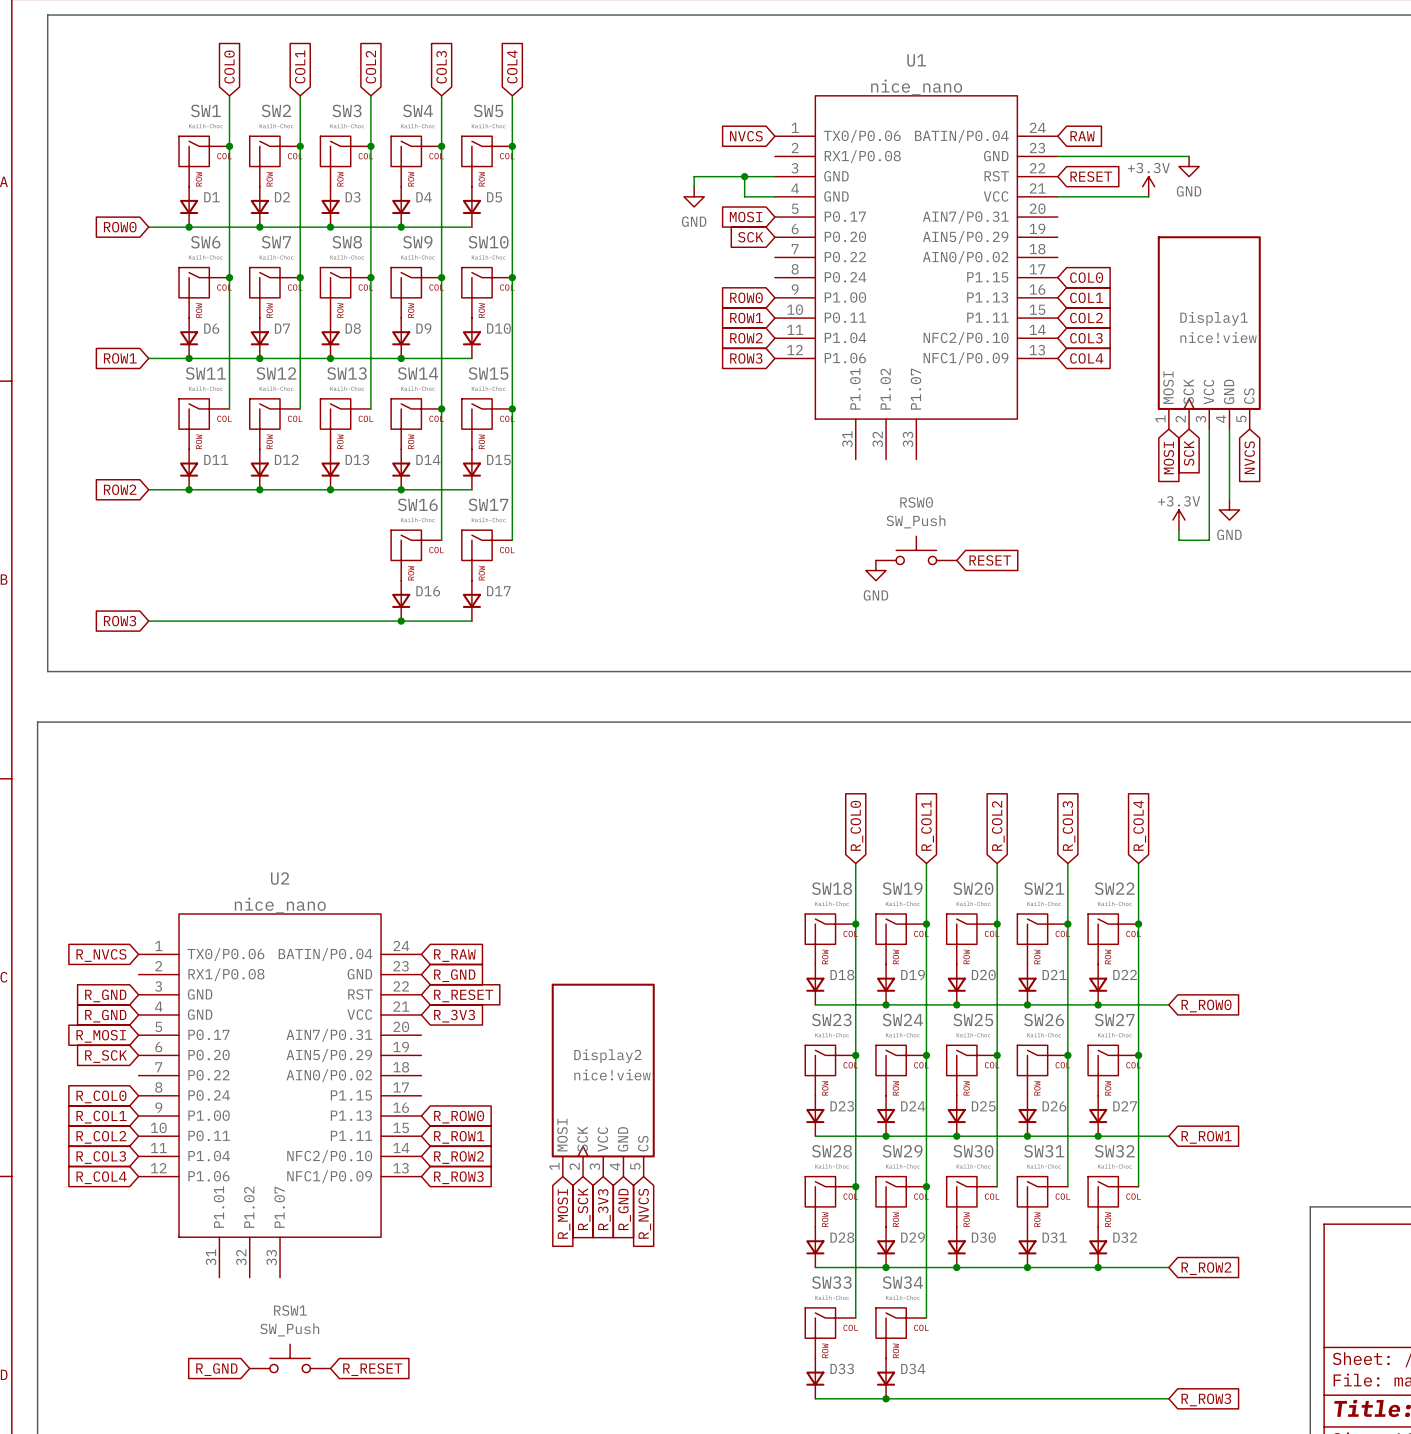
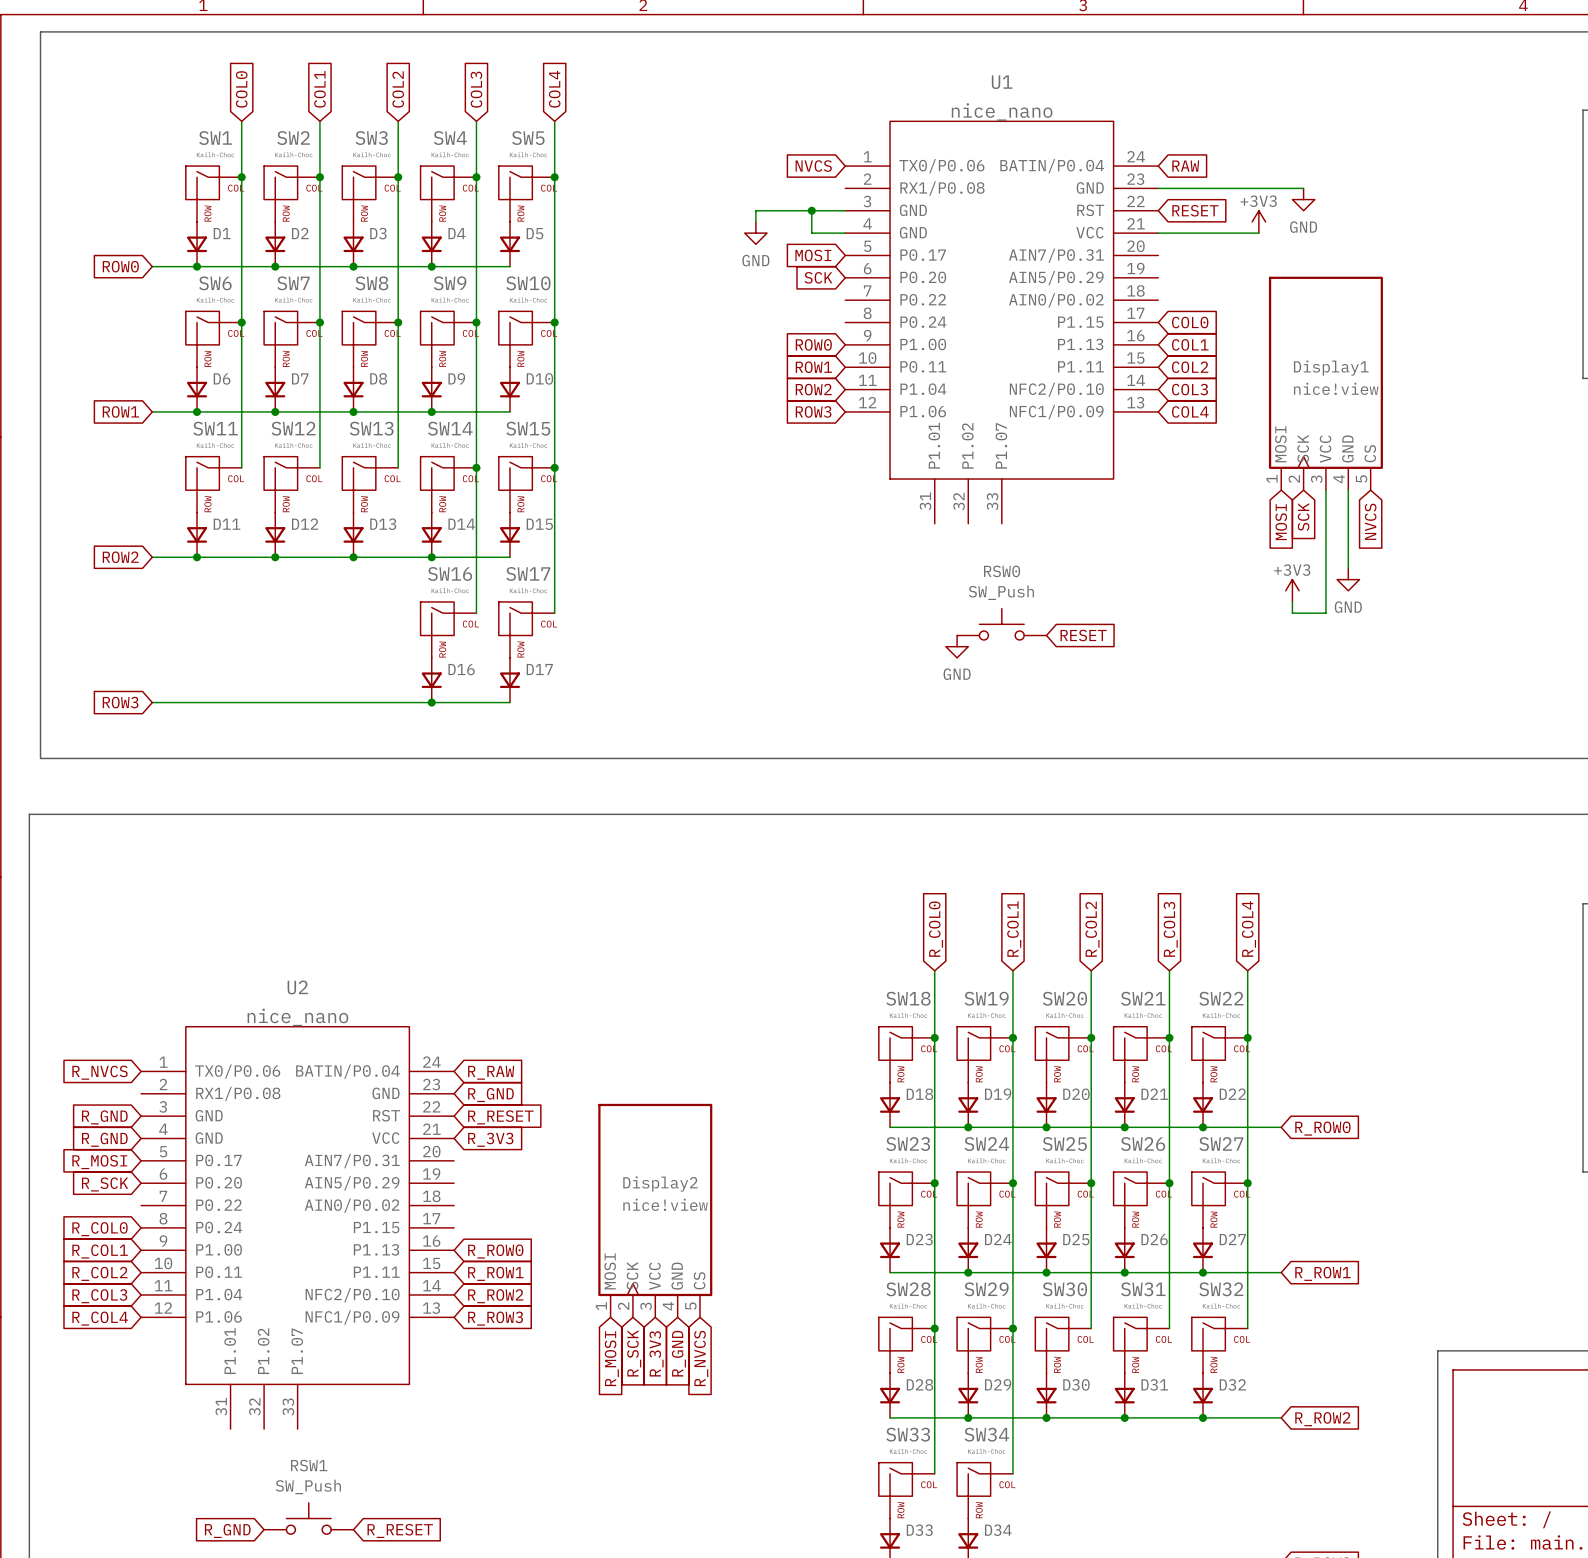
power symbol: +3.3V (1148, 186) -> +3V3 (1258, 221)
power symbol: +3.3V (1178, 520) -> +3V3 (1292, 590)

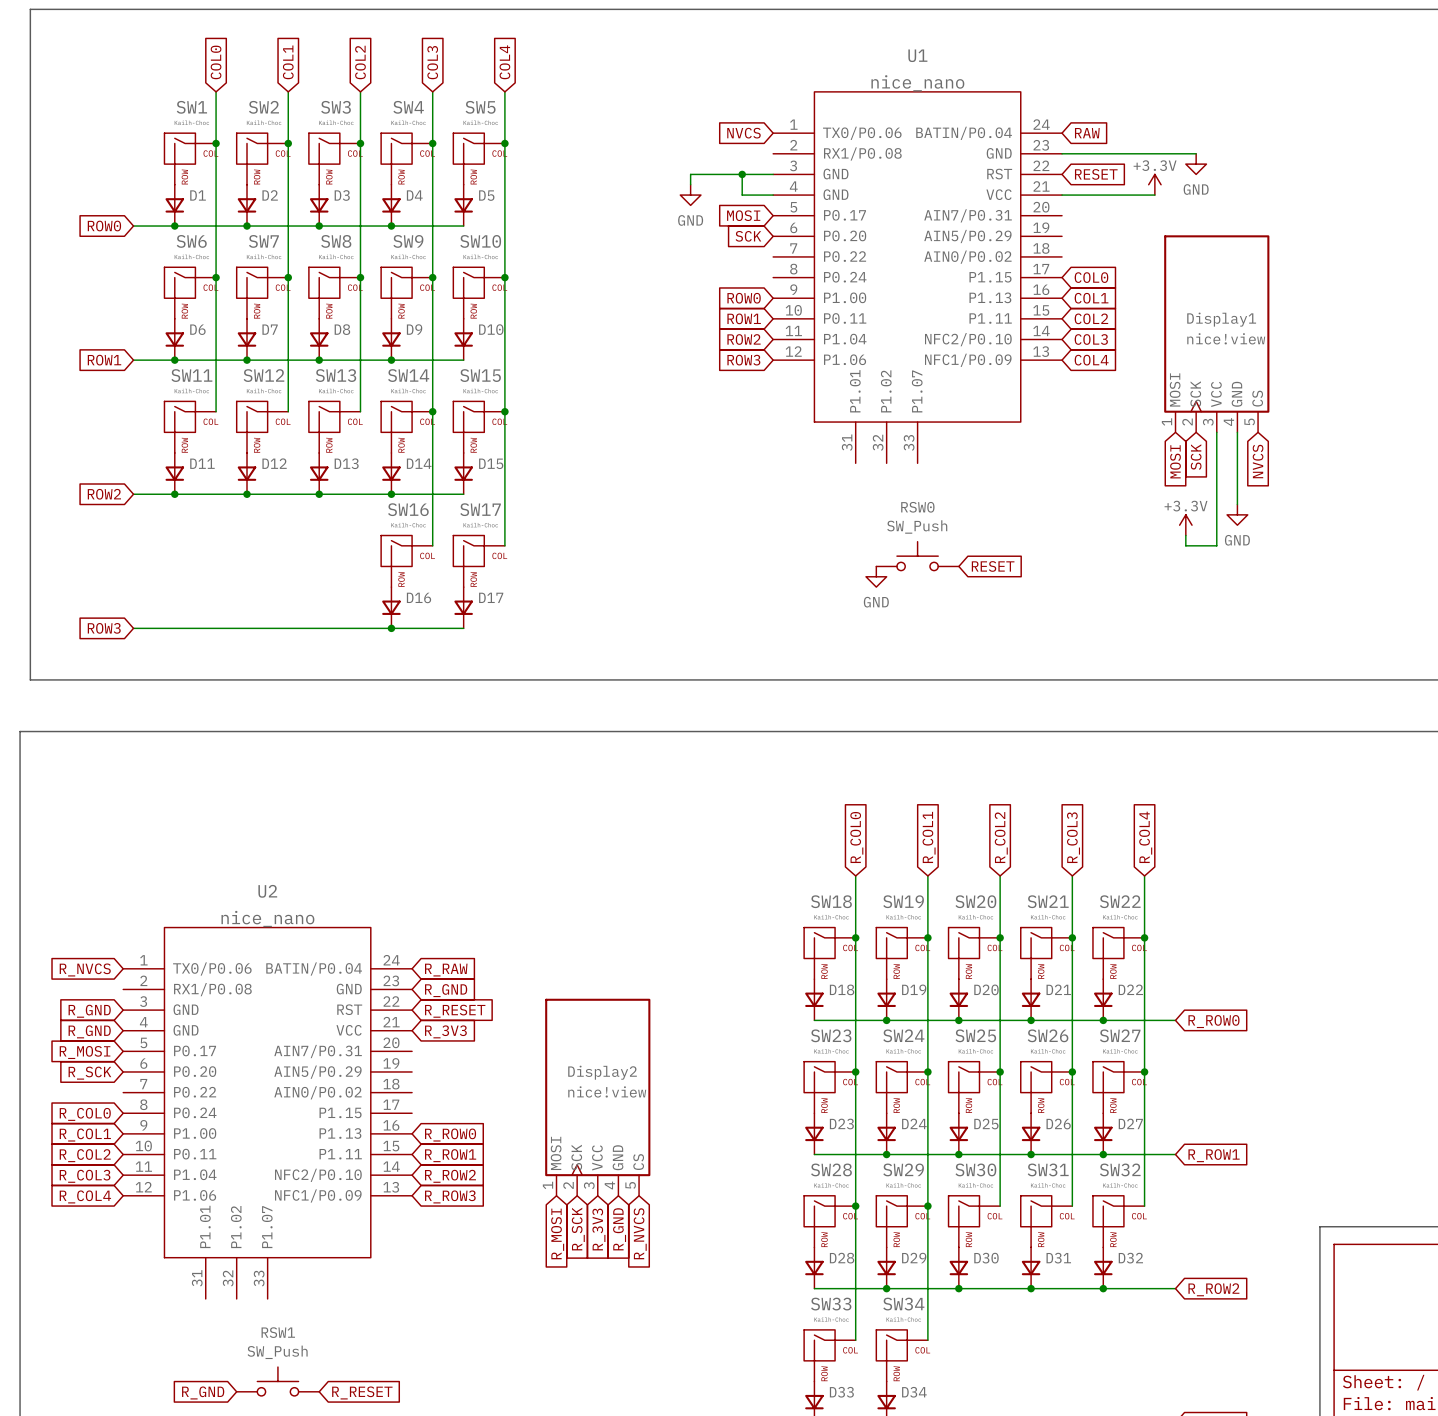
power symbol: +3V3 (1258, 221) -> +3.3V (1154, 184)
power symbol: +3V3 (1292, 590) -> +3.3V (1185, 525)

